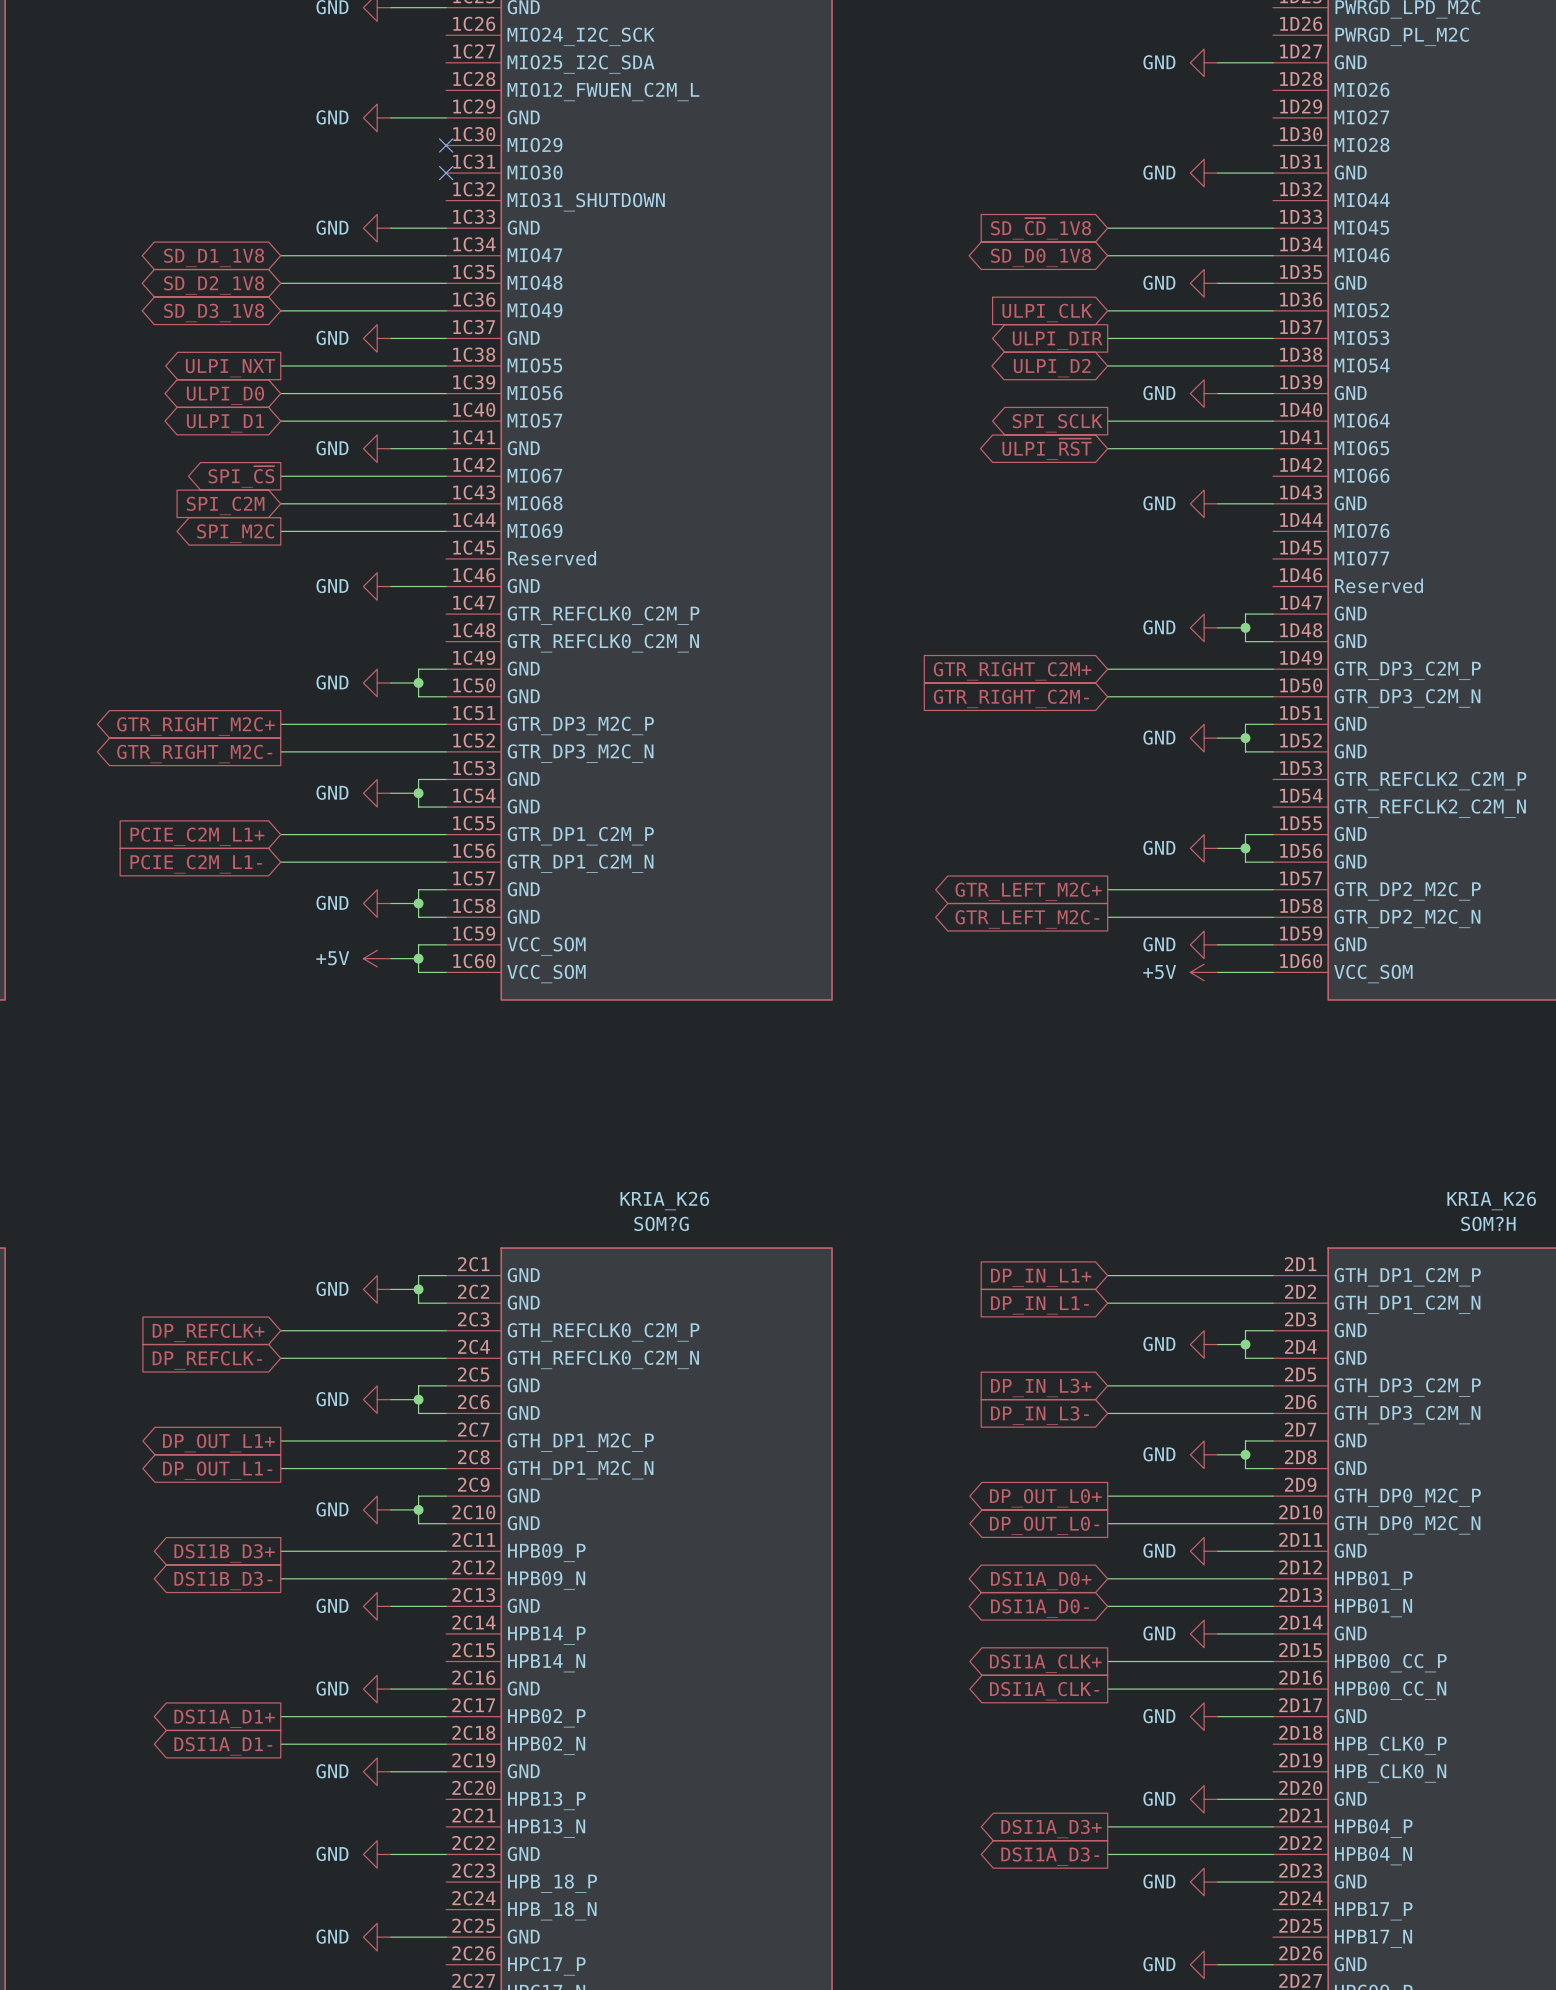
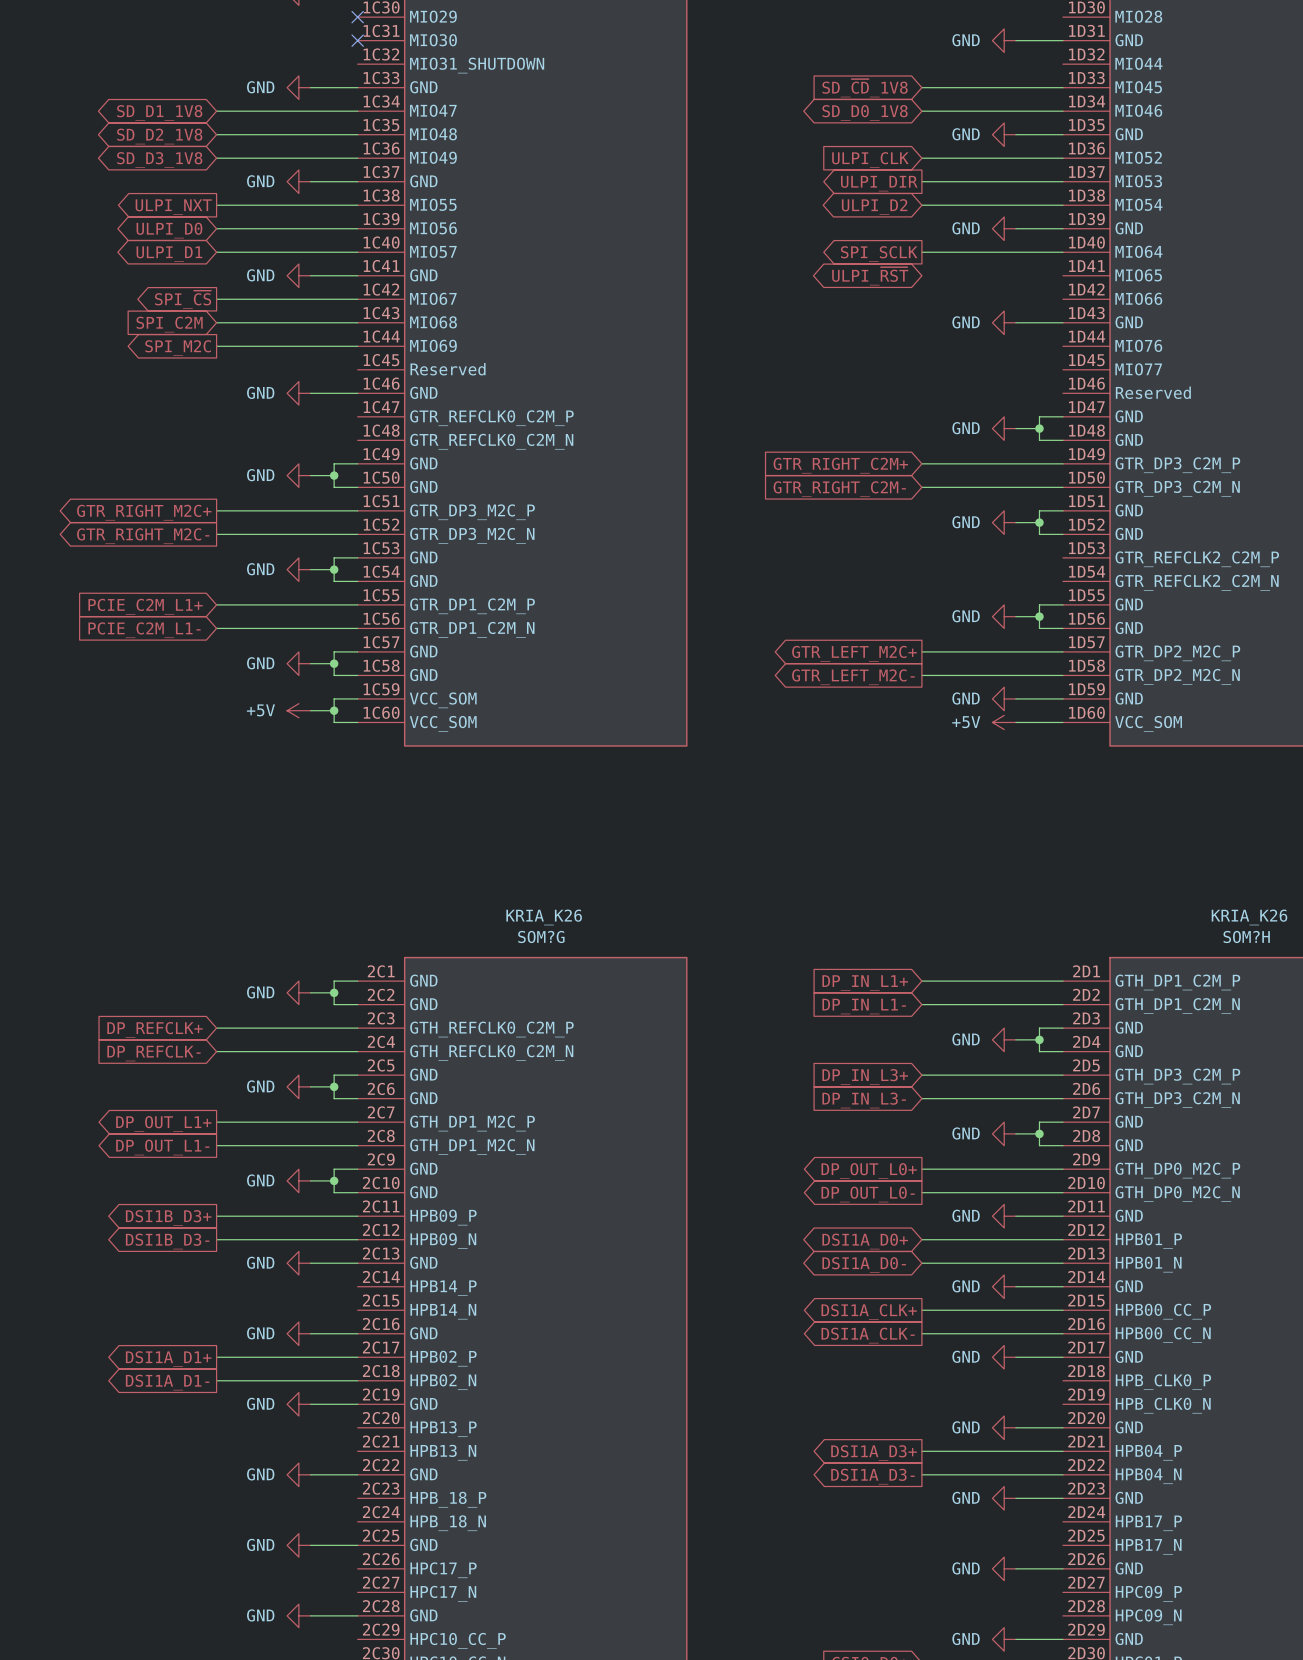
wire: (1107, 448) (1273, 448) -> none

